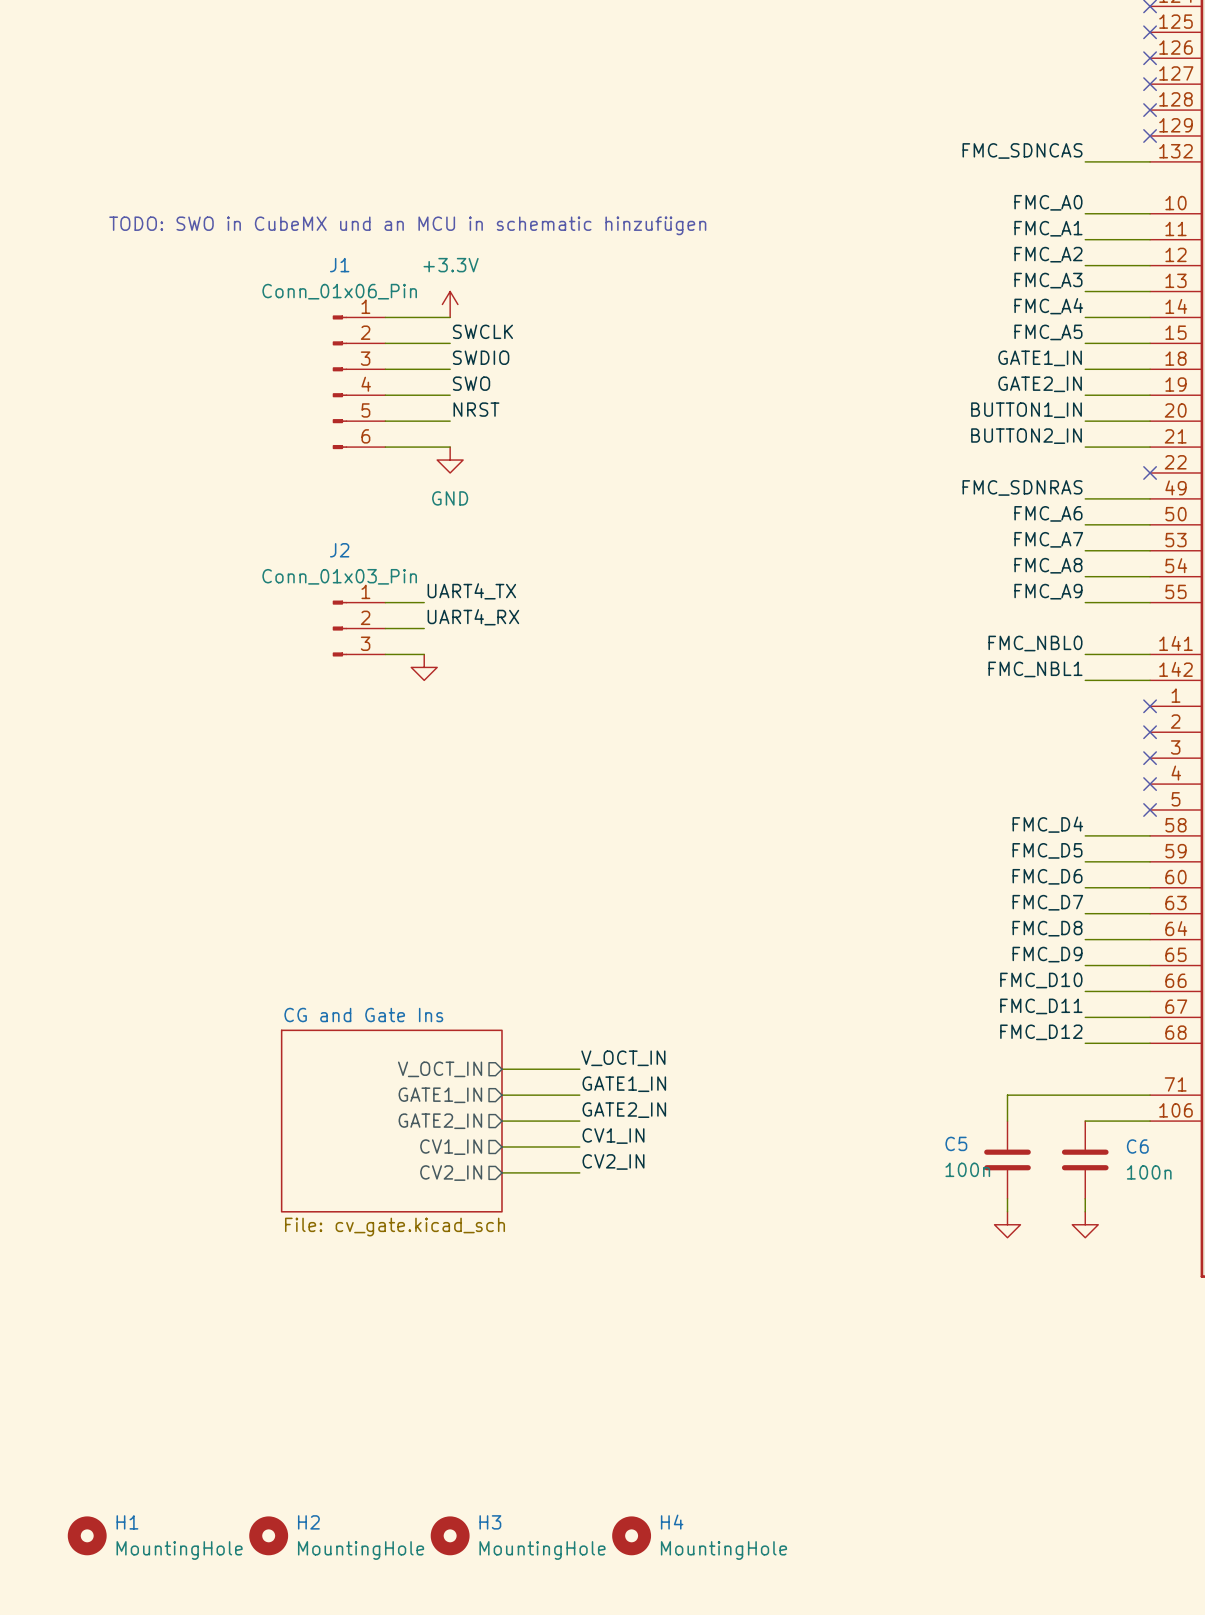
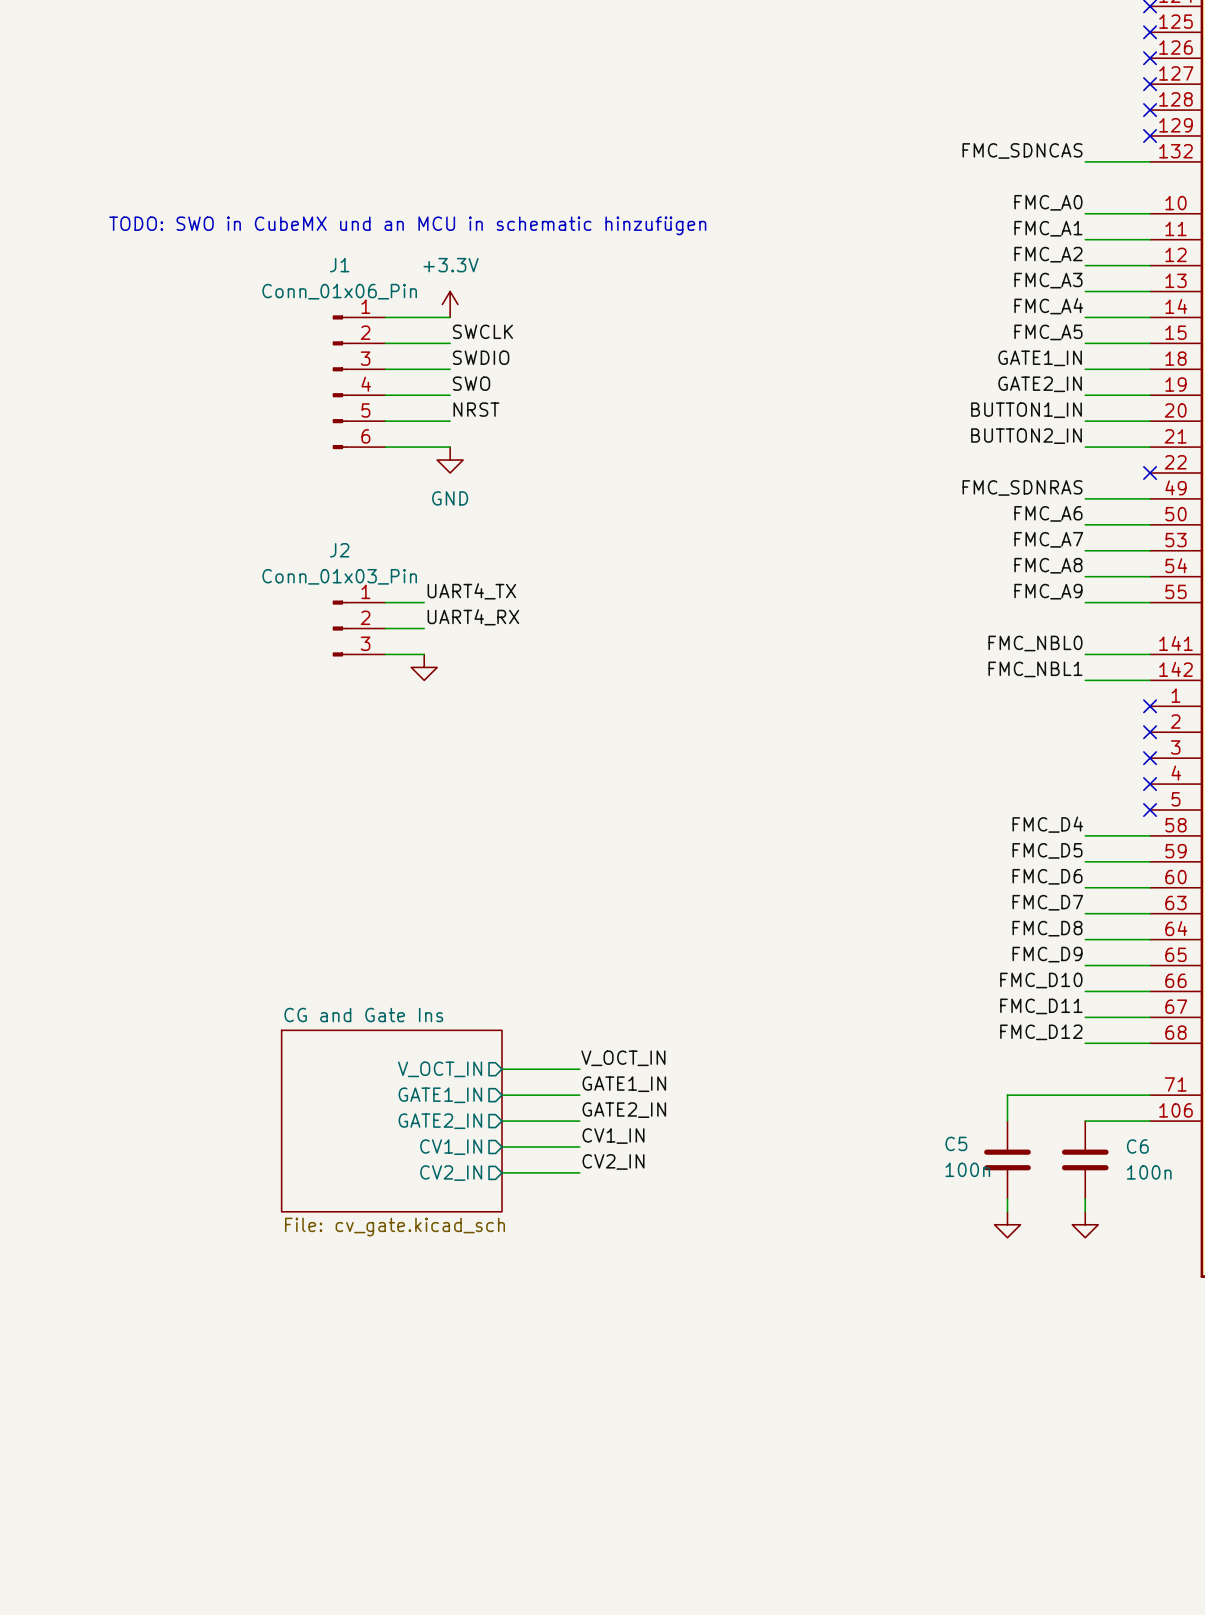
H1: MountingHole (87, 1535) -> none
H2: MountingHole (268, 1535) -> none
H3: MountingHole (450, 1535) -> none
H4: MountingHole (631, 1535) -> none

